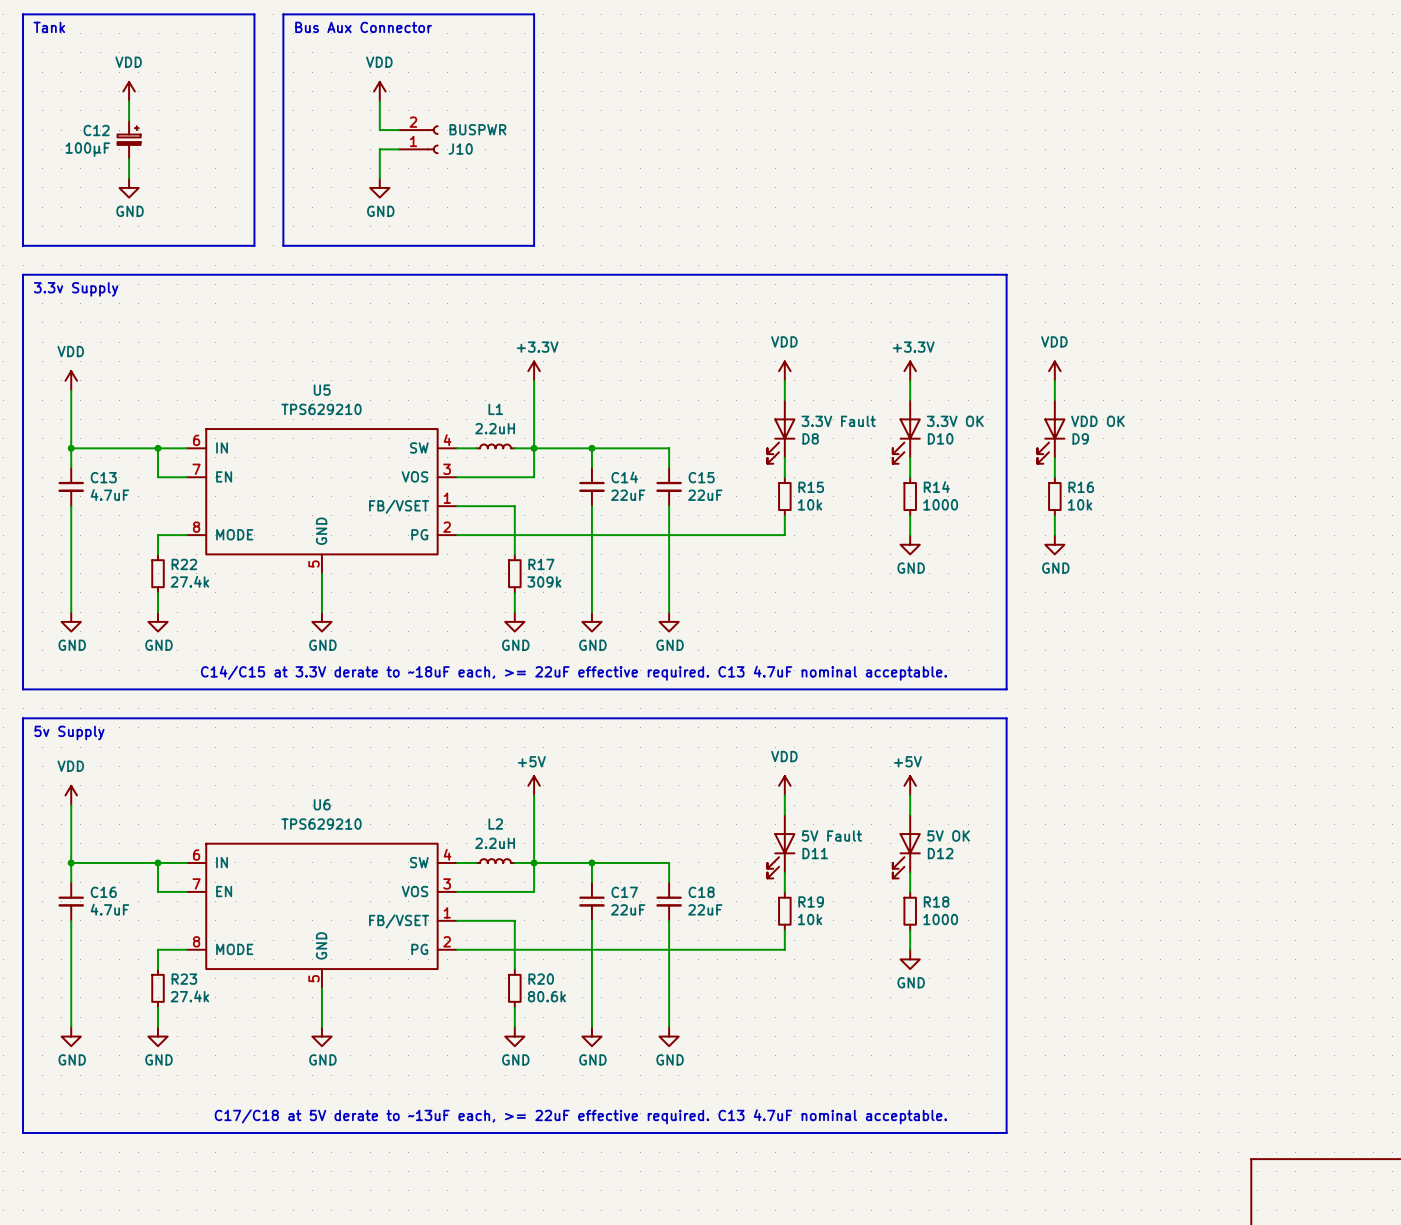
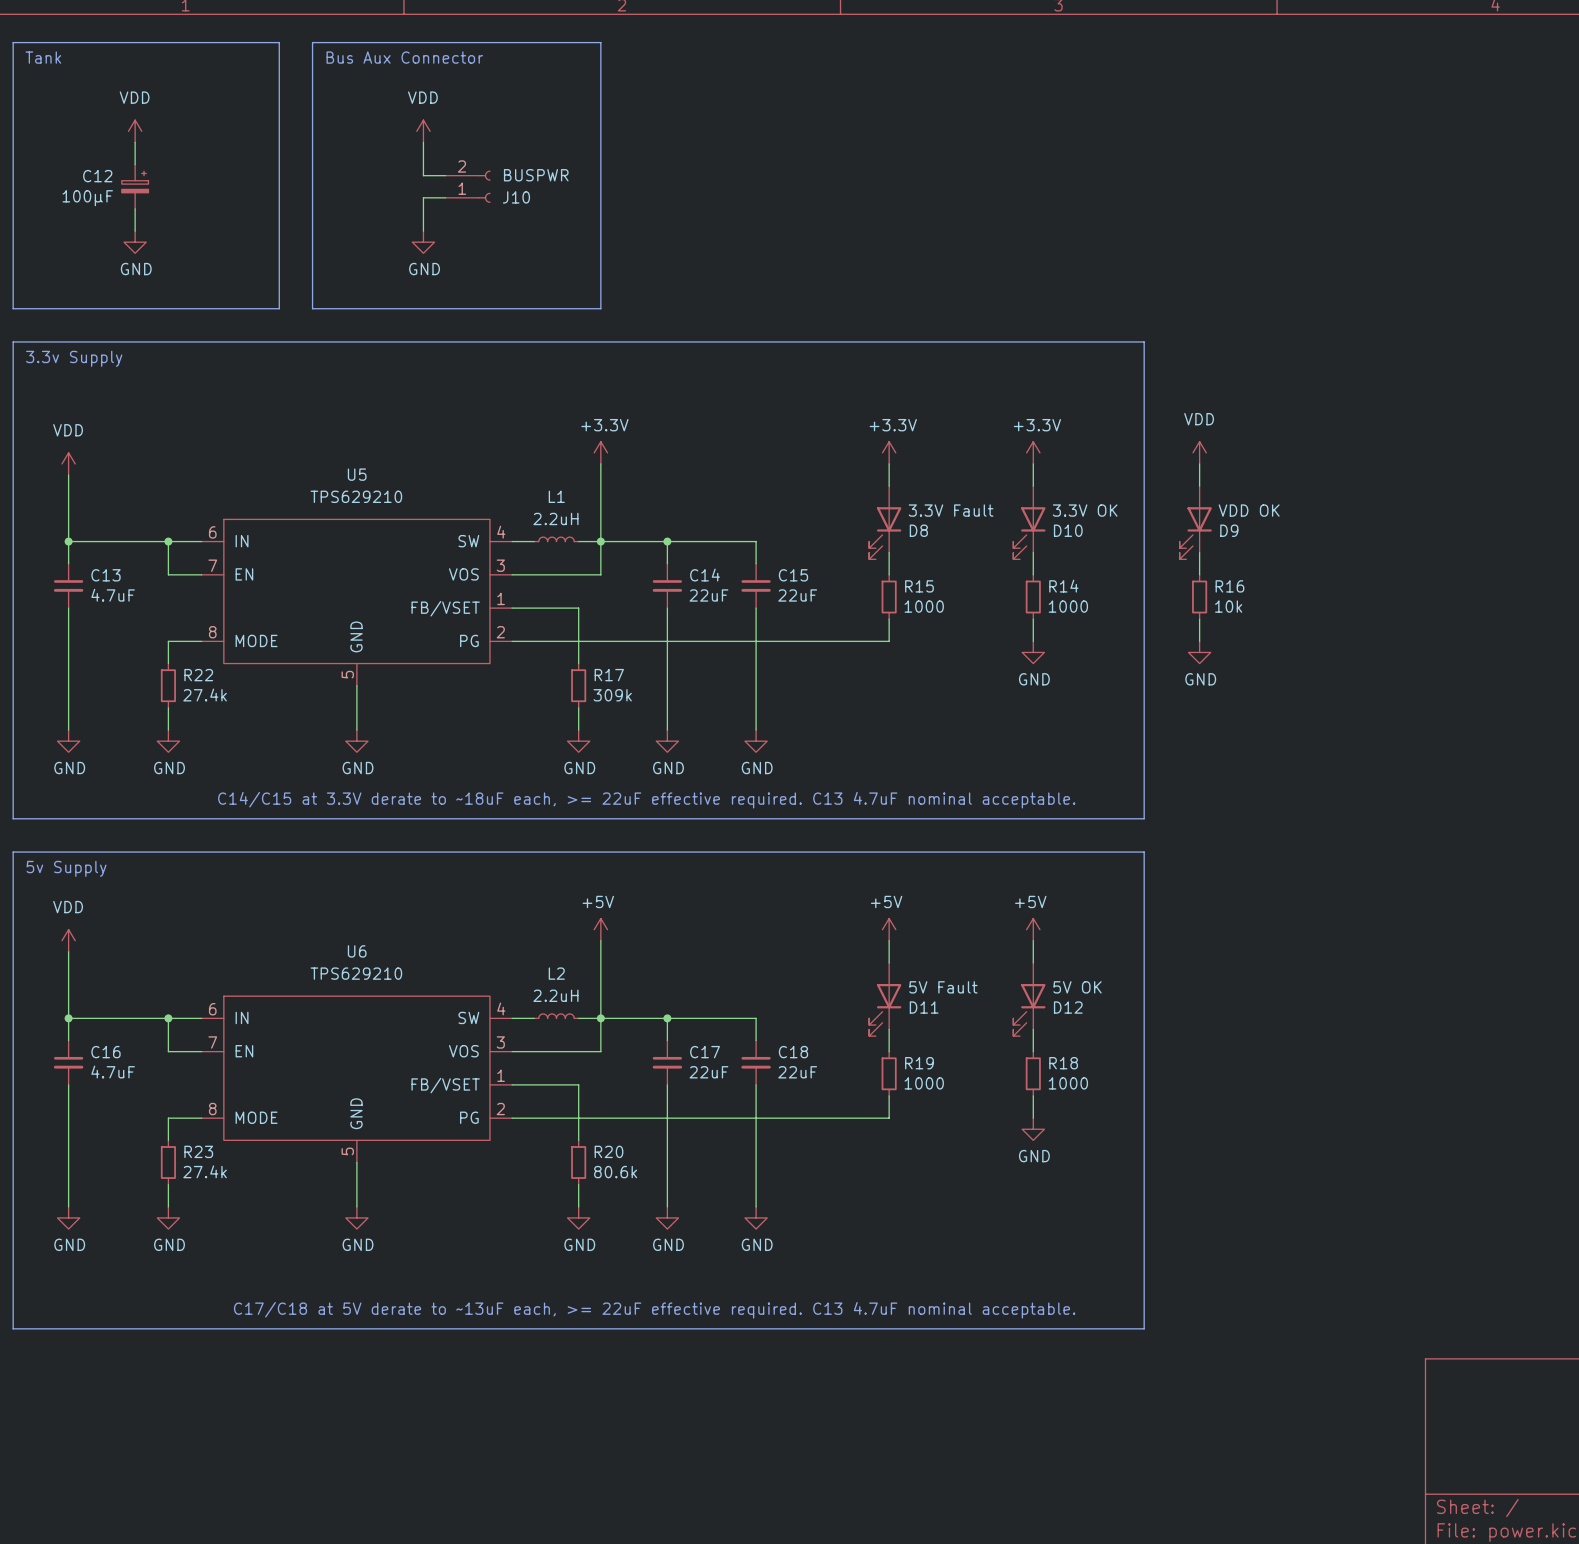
power symbol: VDD (784, 371) -> +3.3V (889, 452)
R15 value: 10k (810, 504) -> 1000 (924, 606)
power symbol: VDD (784, 785) -> +5V (889, 929)
R19 value: 10k (810, 919) -> 1000 (924, 1083)

